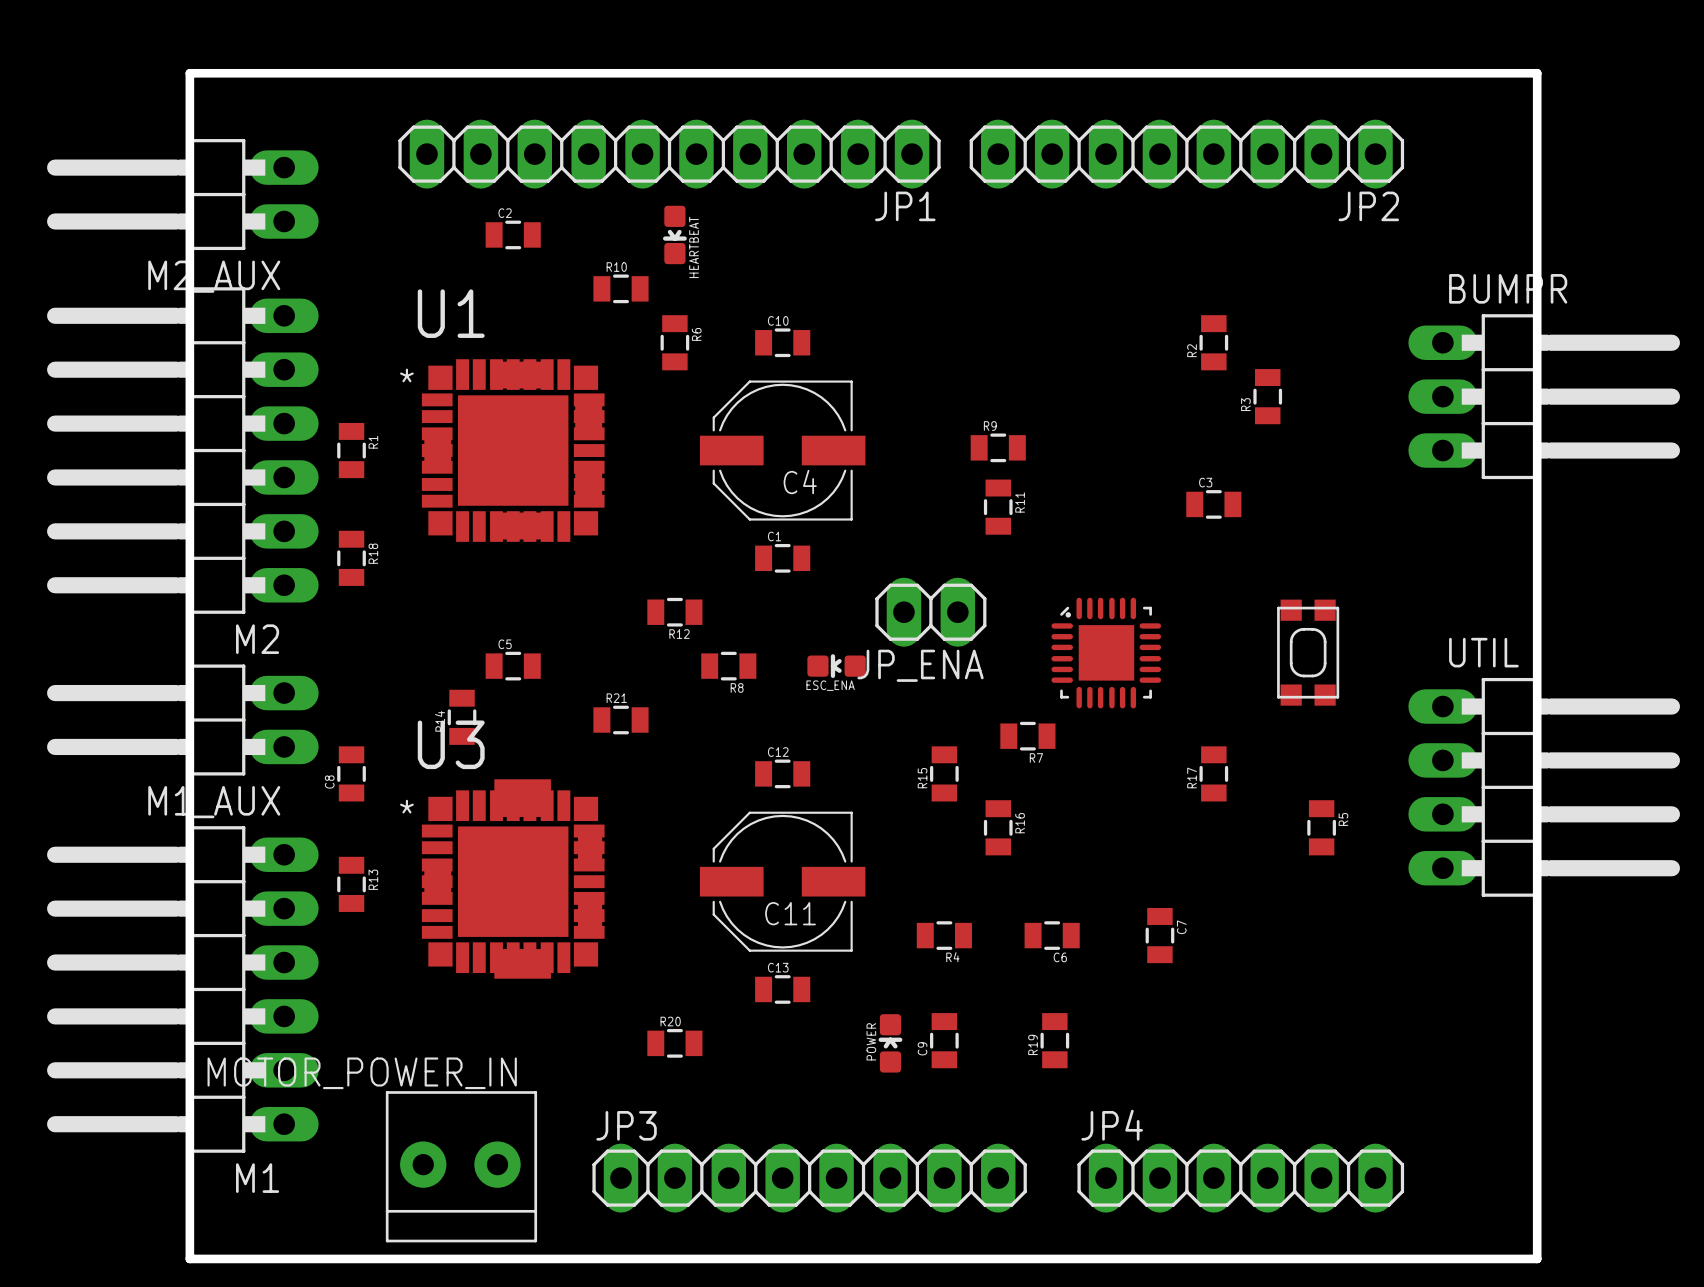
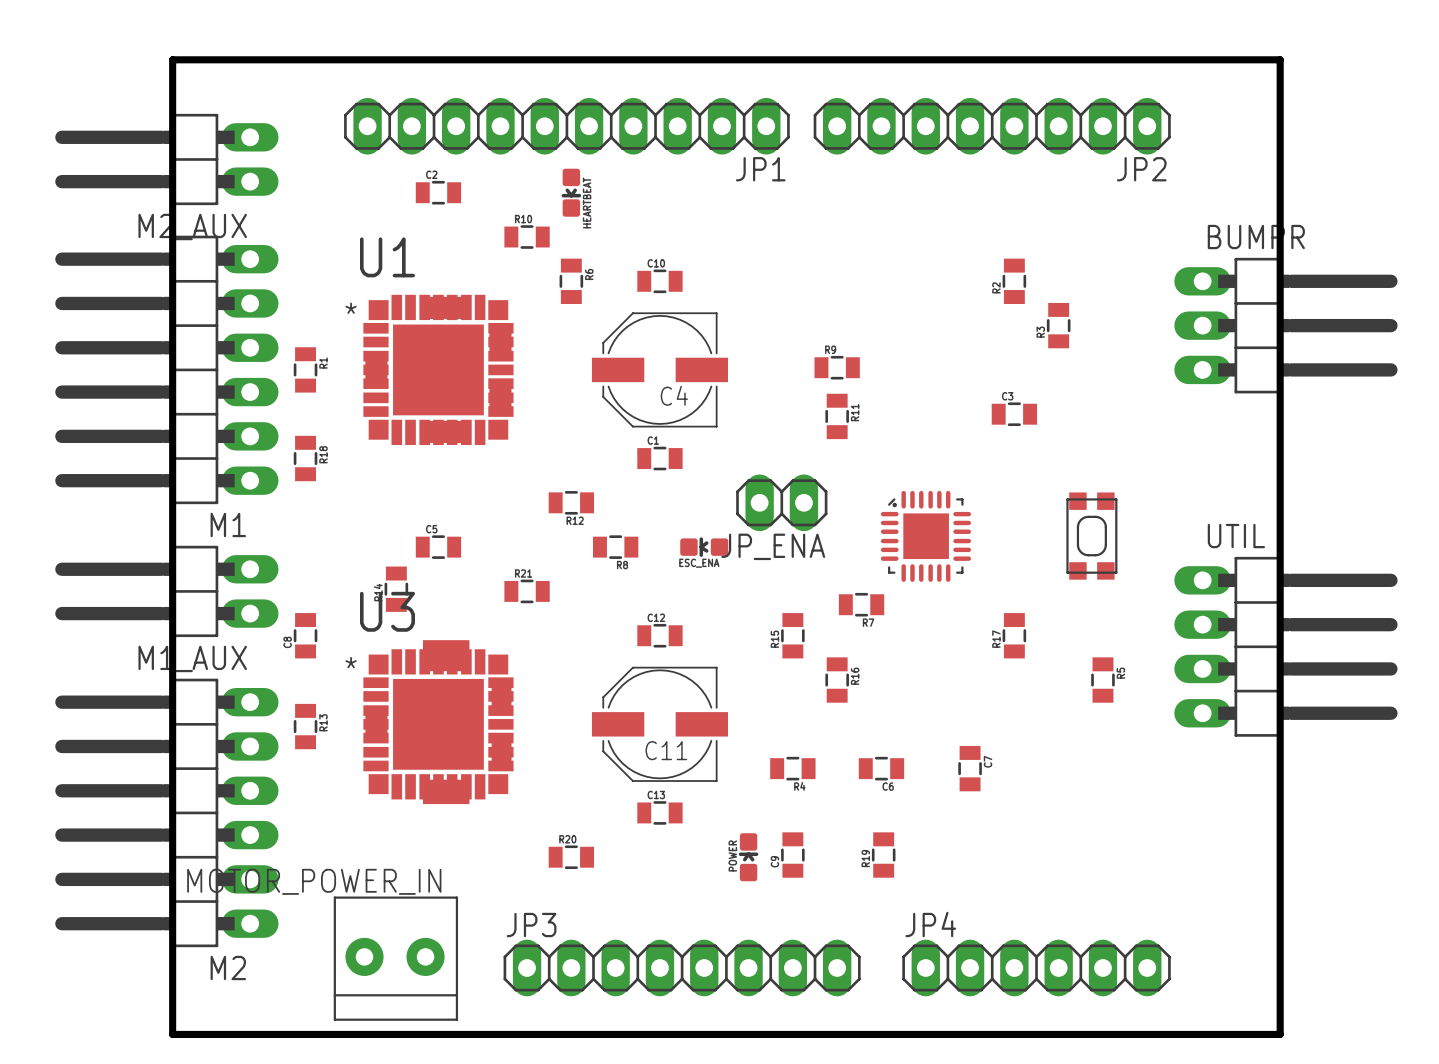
M2 name: M2 (257, 639) -> M1 (228, 524)
M1 name: M1 (257, 1178) -> M2 (228, 967)

